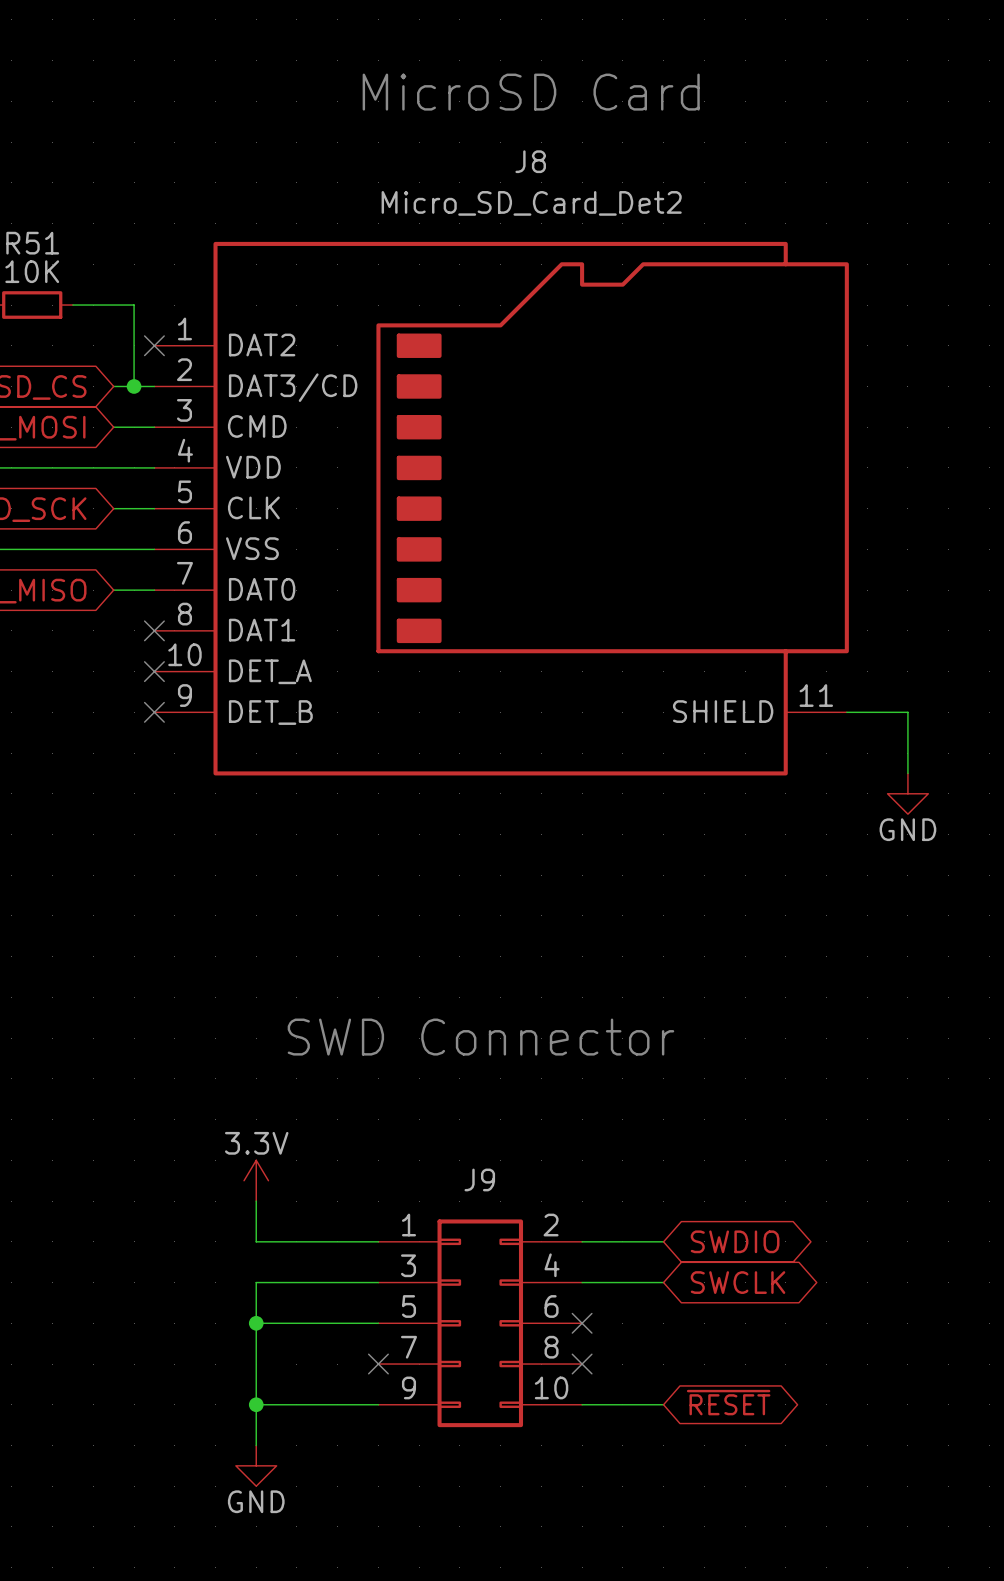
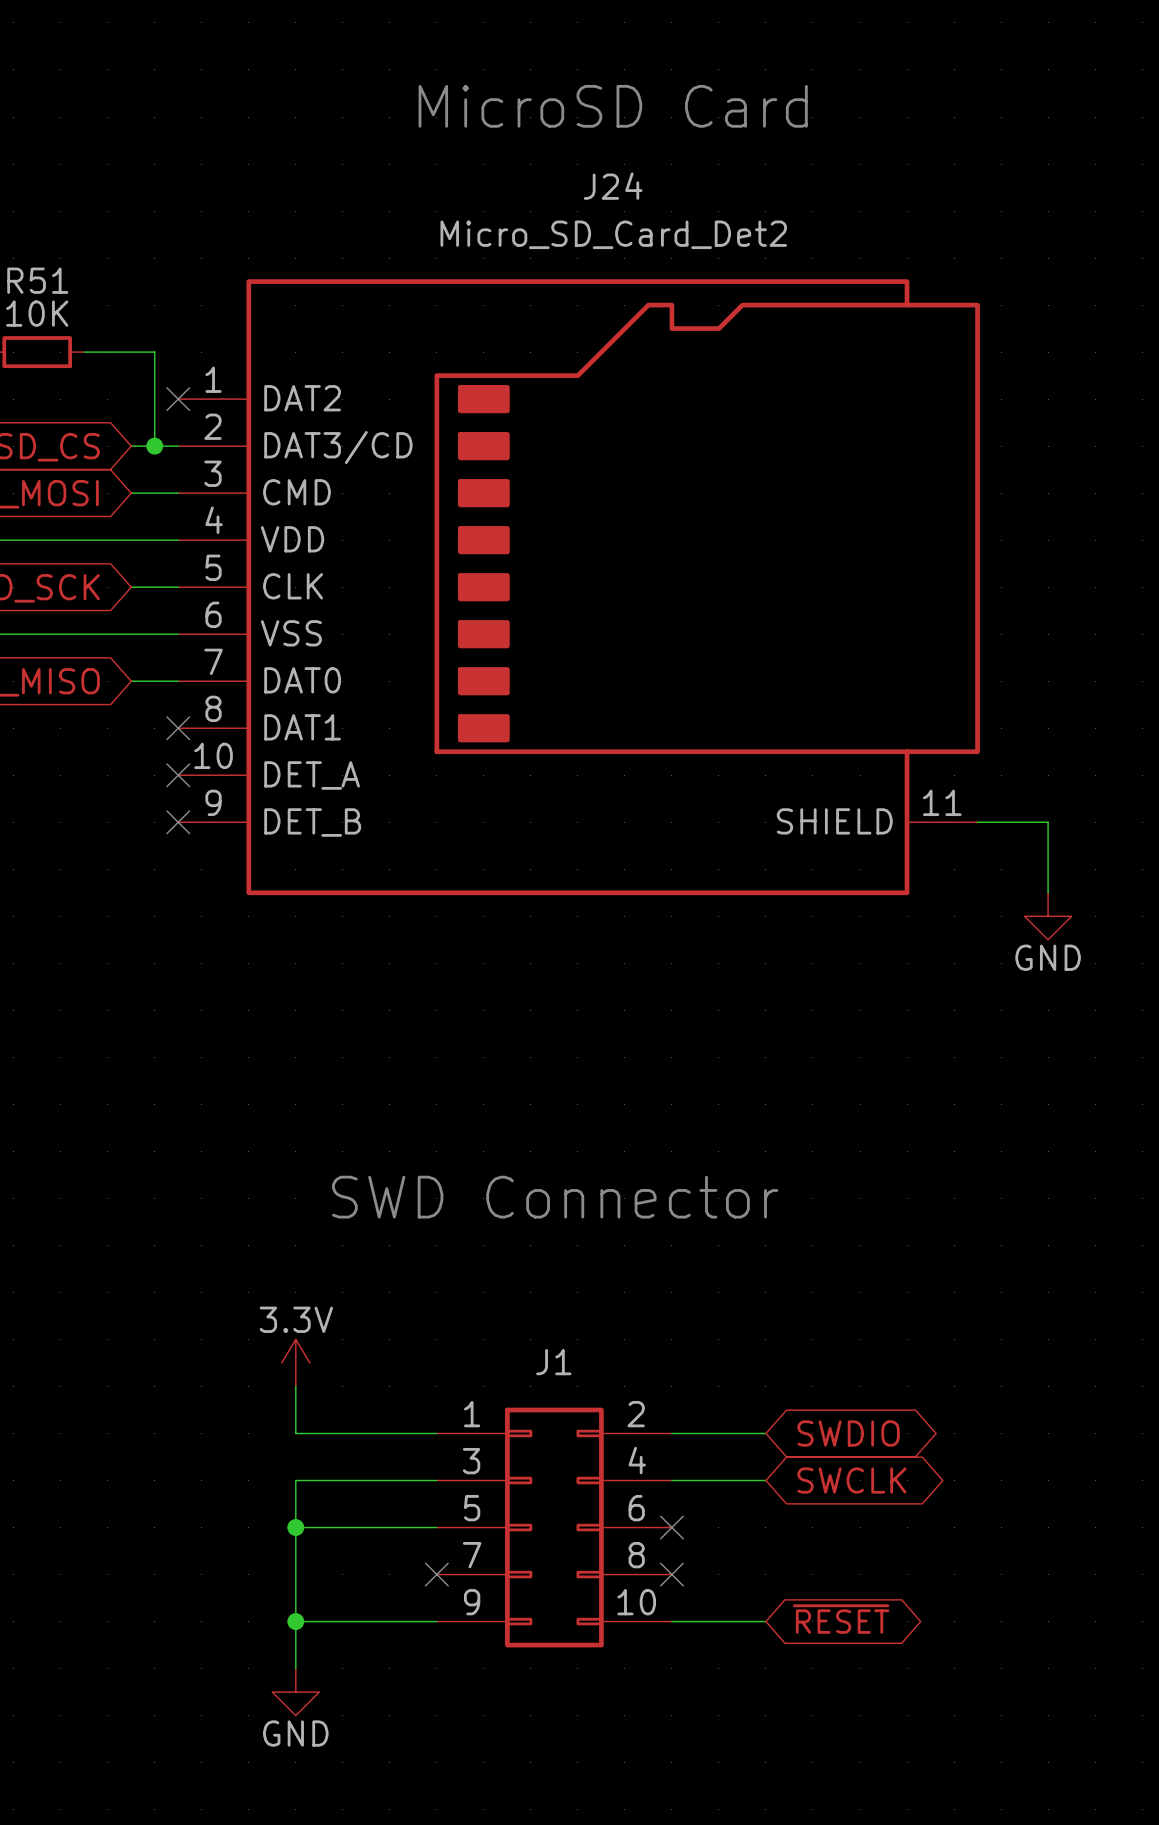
J8 name: J8 (530, 161) -> J24 (613, 186)
J9 name: J9 (479, 1179) -> J1 (553, 1362)

